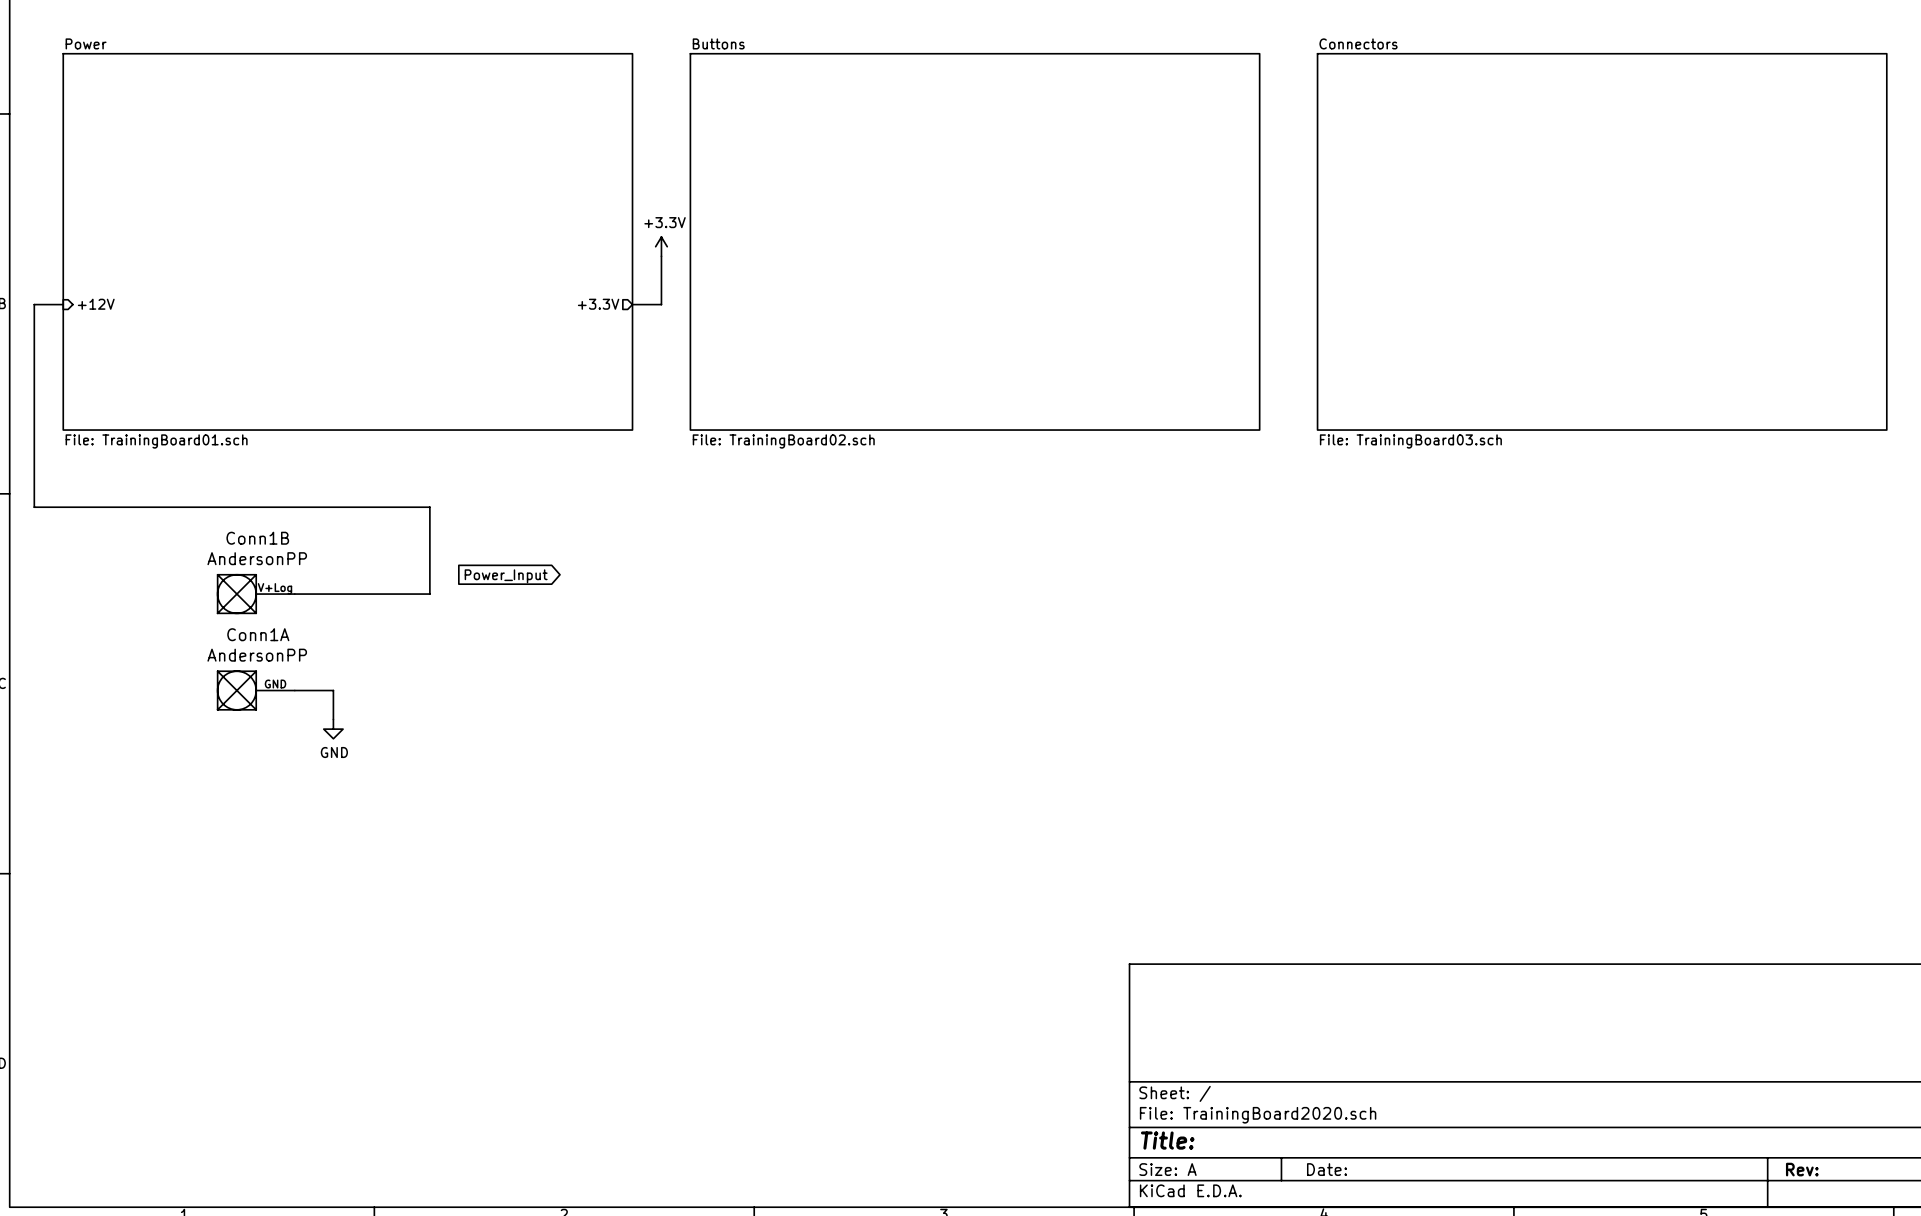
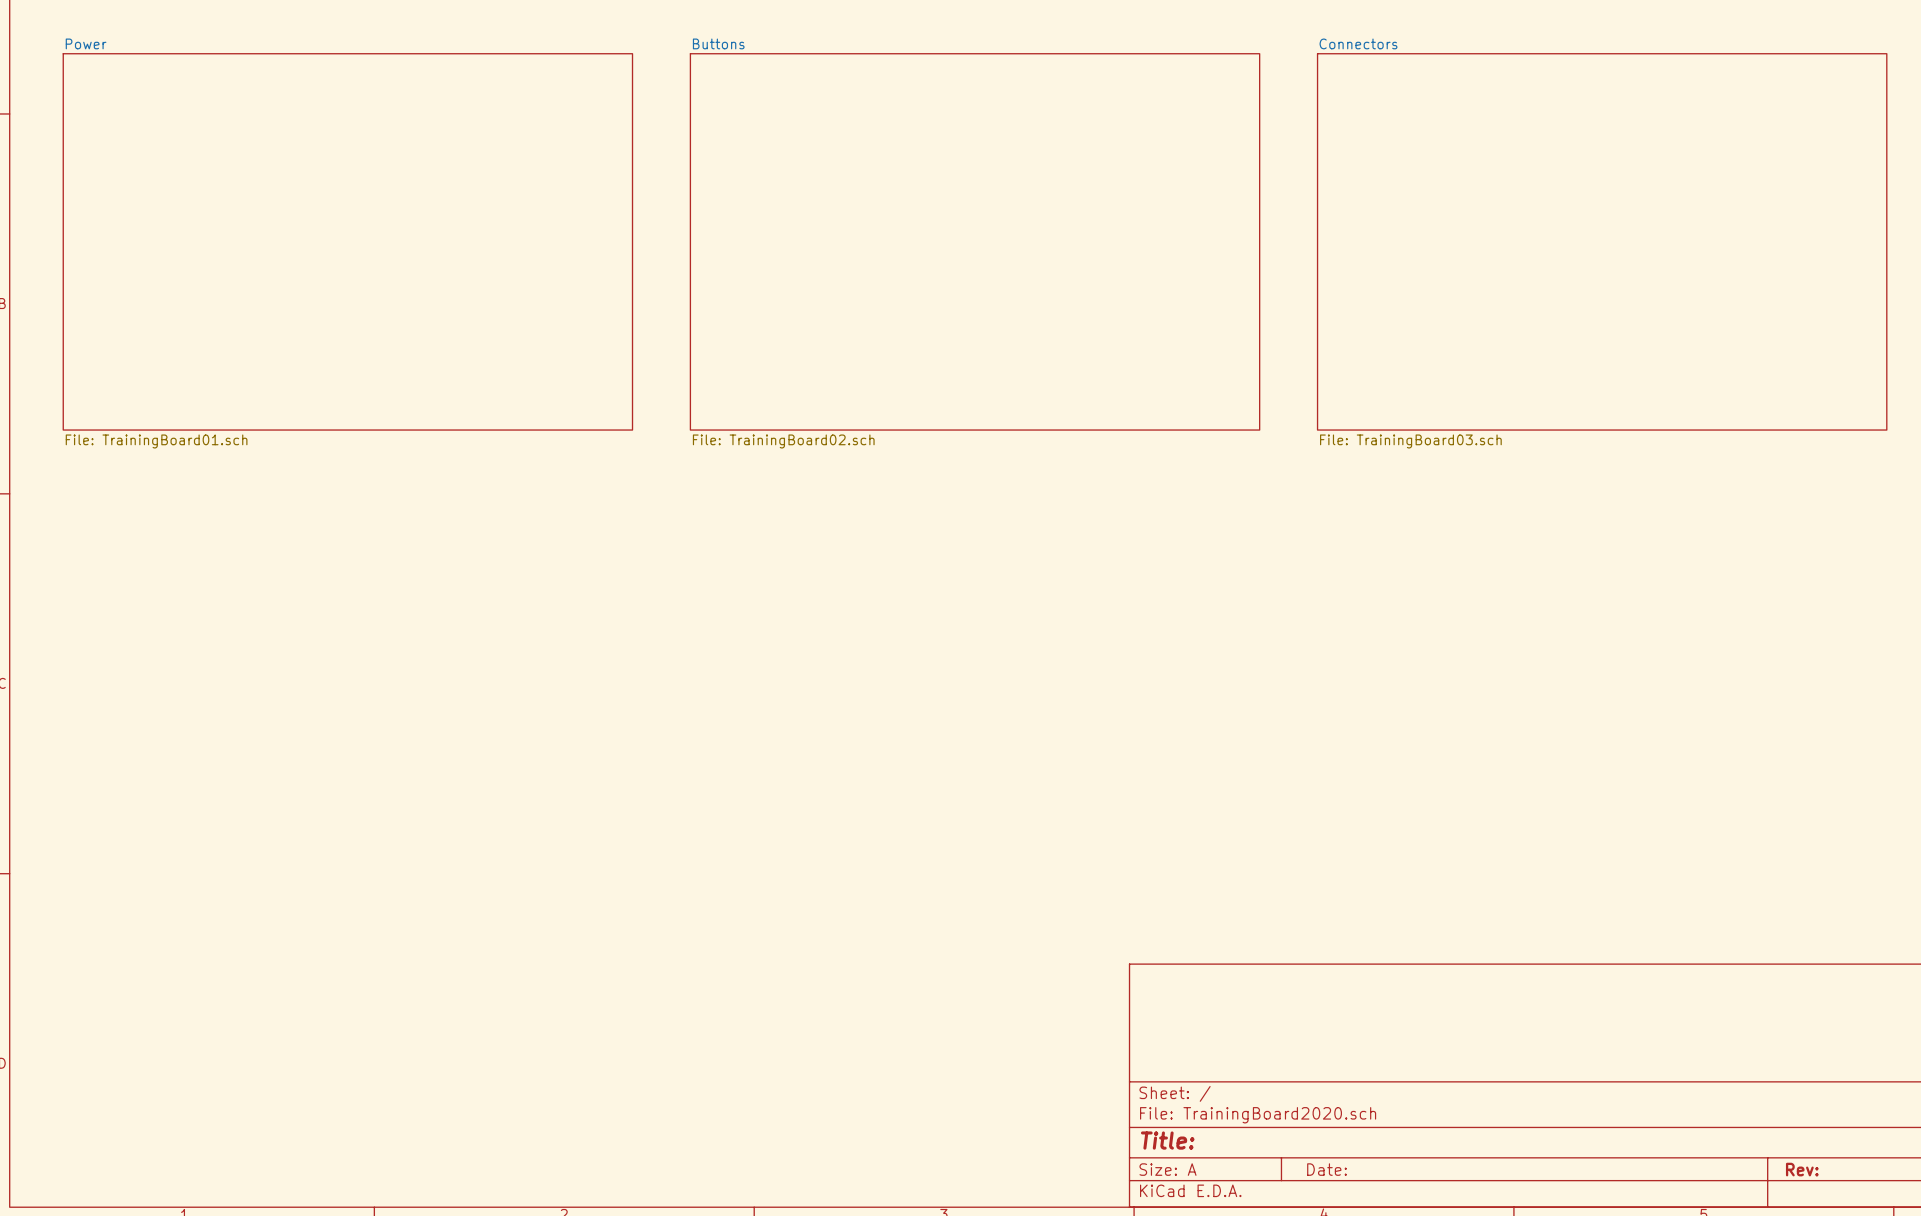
power symbol: +3.3V (661, 246) -> none
wire: (661, 256) (661, 304) (632, 304) -> none
wire: (63, 304) (34, 304) (34, 507) (429, 507) (429, 594) (294, 594) -> none
sheet pin: +12V (96, 304) -> none
sheet pin: +3.3V (598, 304) -> none
global label: Power_Input (506, 576) -> none
Conn1B: AndersonPP (256, 594) -> none
Conn1A: AndersonPP (256, 690) -> none
wire: (294, 690) (333, 690) (333, 719) -> none
power symbol: GND (333, 729) -> none

